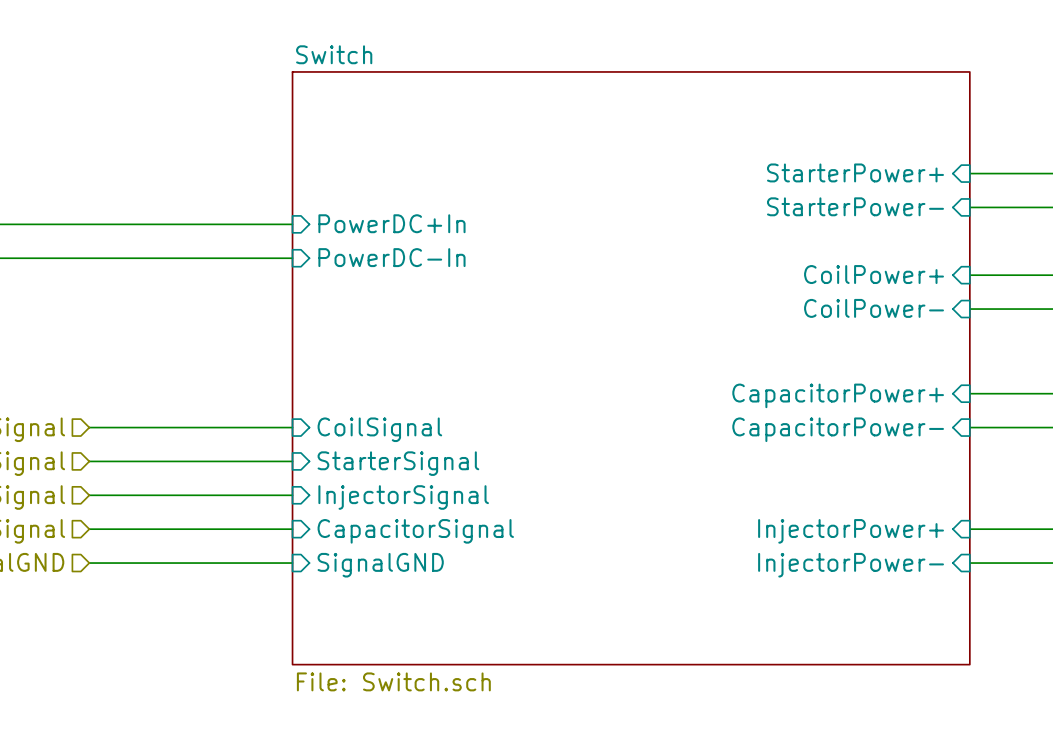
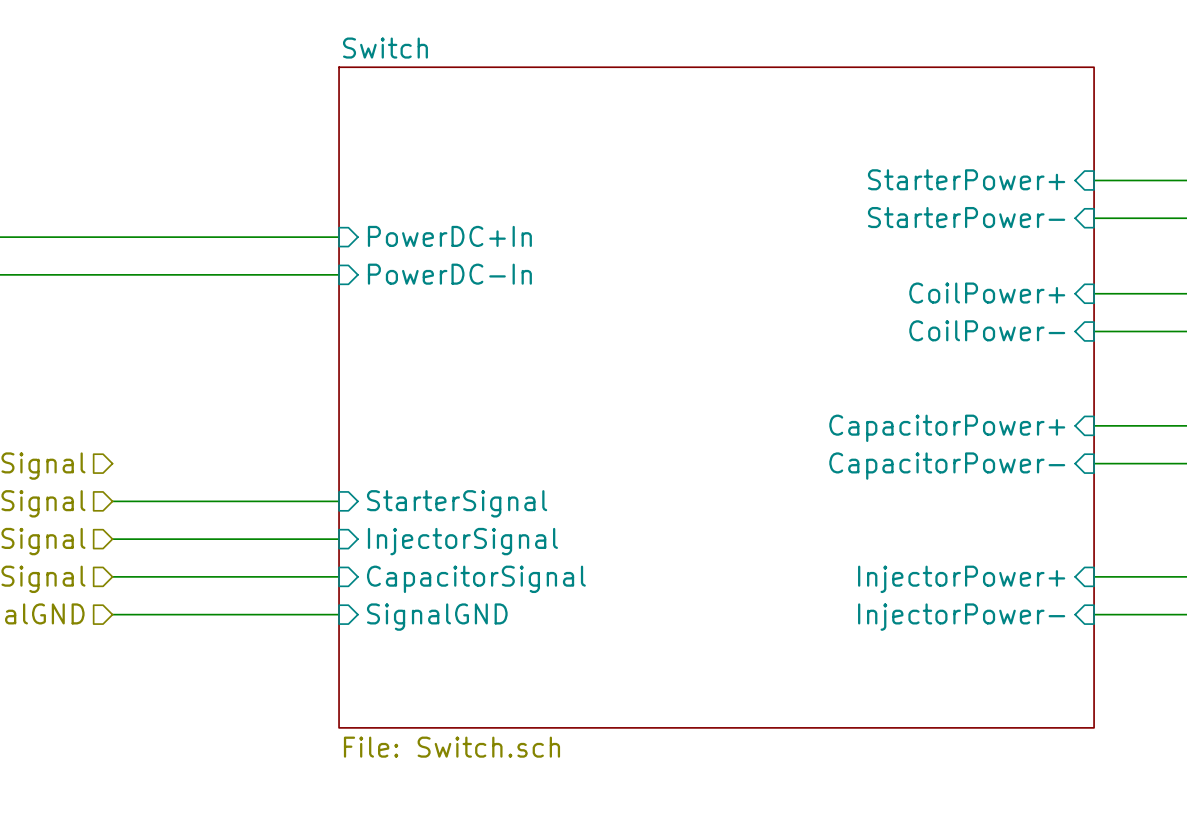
wire: (89, 427) (292, 427) -> none
sheet pin: CoilSignal (379, 429) -> none

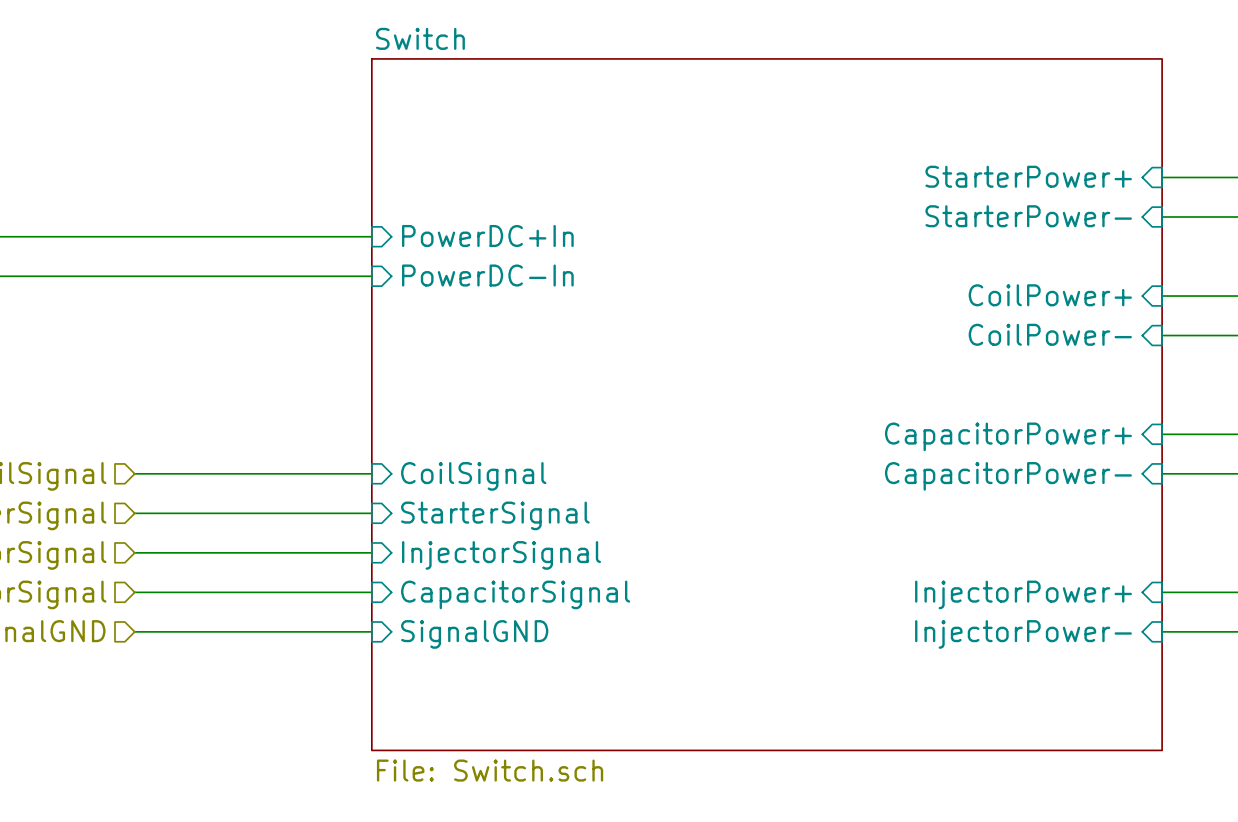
wire: none -> (134, 473) (371, 473)
sheet pin: none -> CoilSignal (473, 476)

